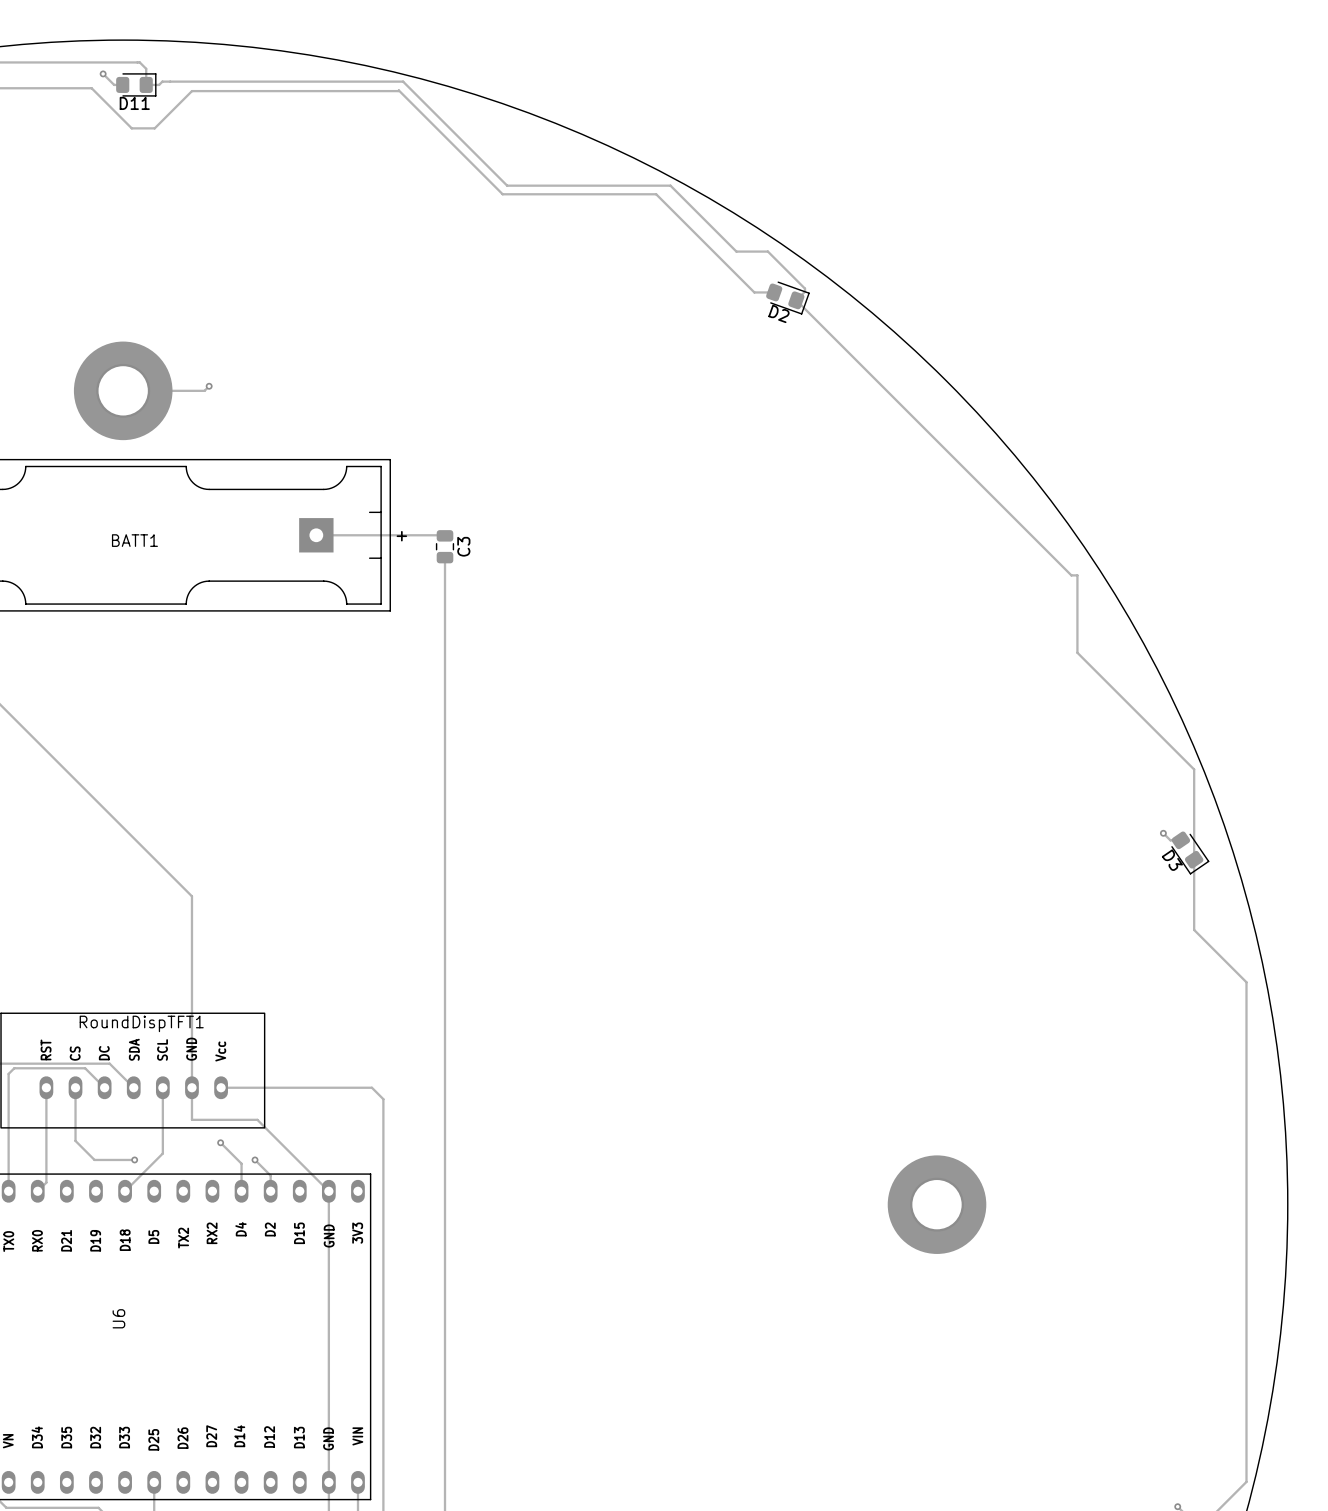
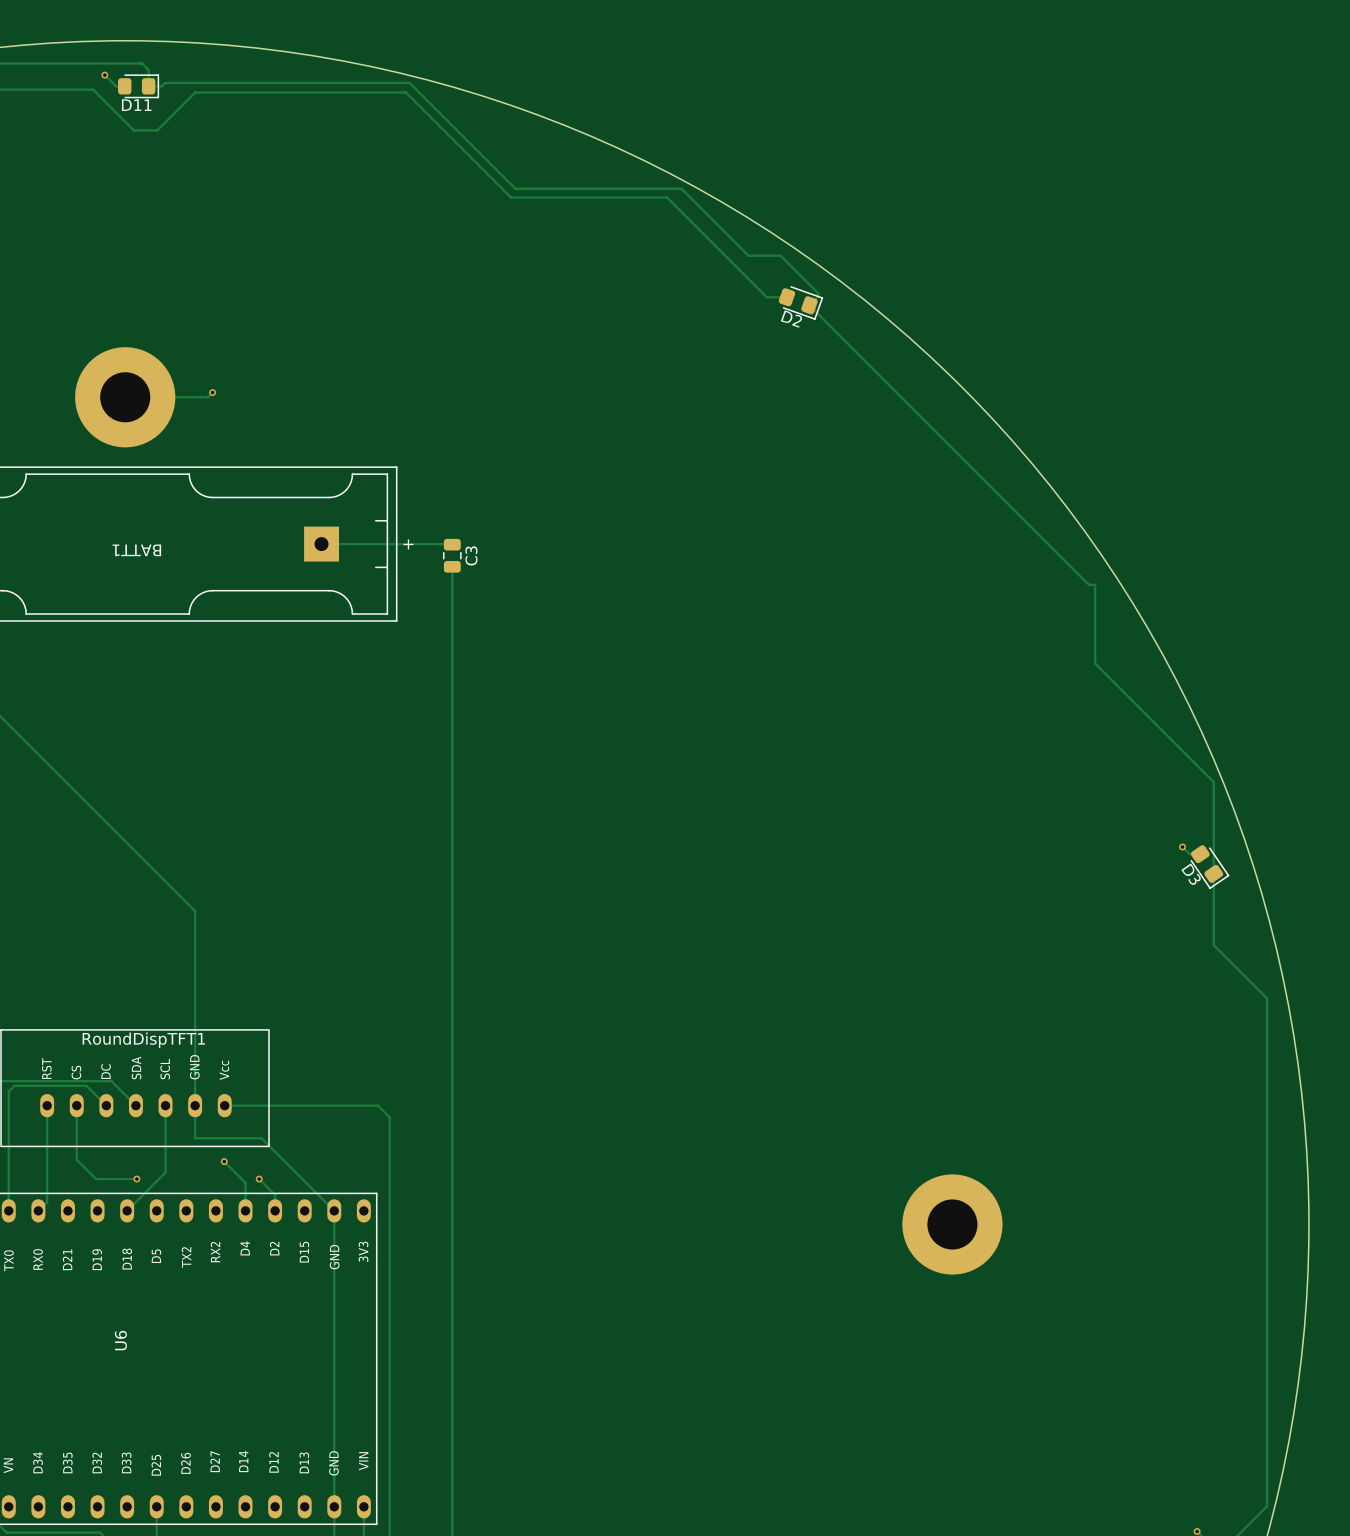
BATT1 name rotation: 0° (134, 540) -> 180° (136, 550)

